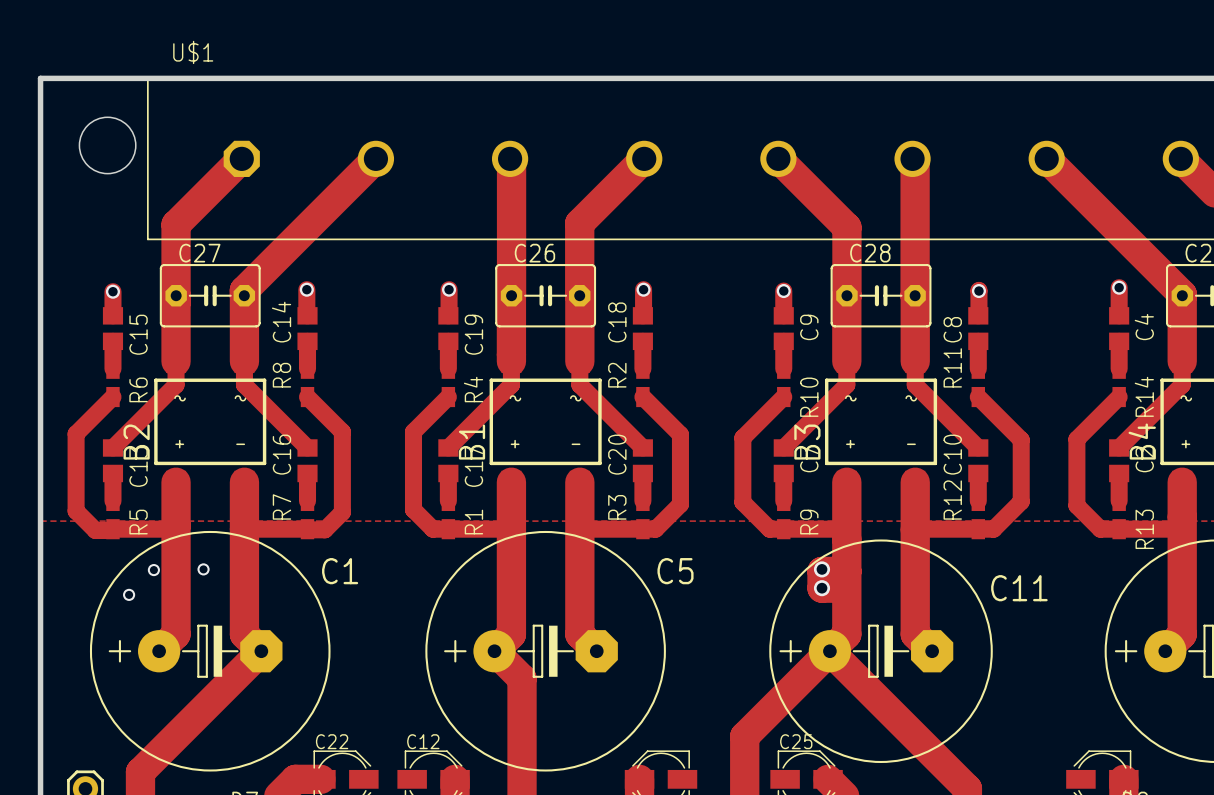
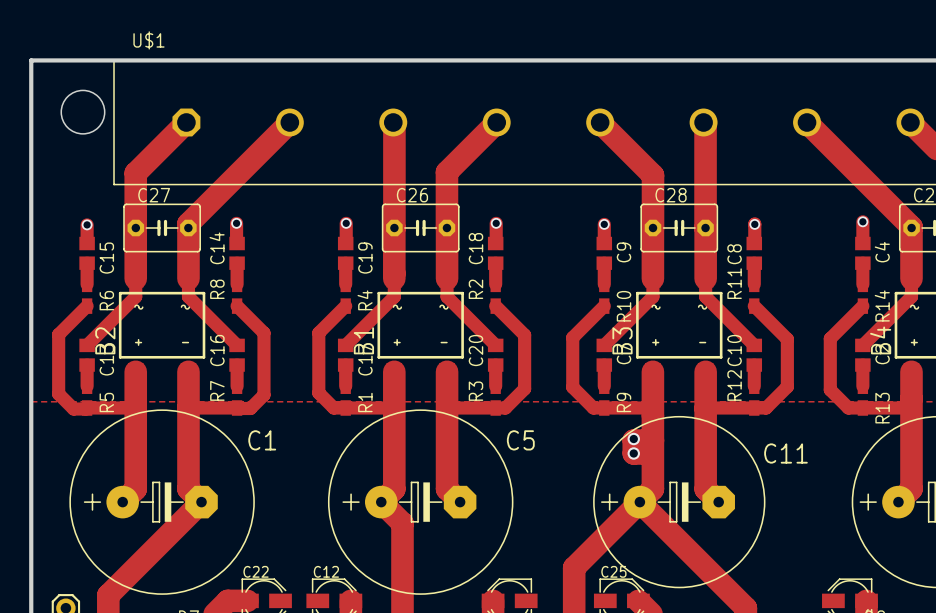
via: (203, 569) -> none
via: (153, 570) -> none
via: (129, 594) -> none

